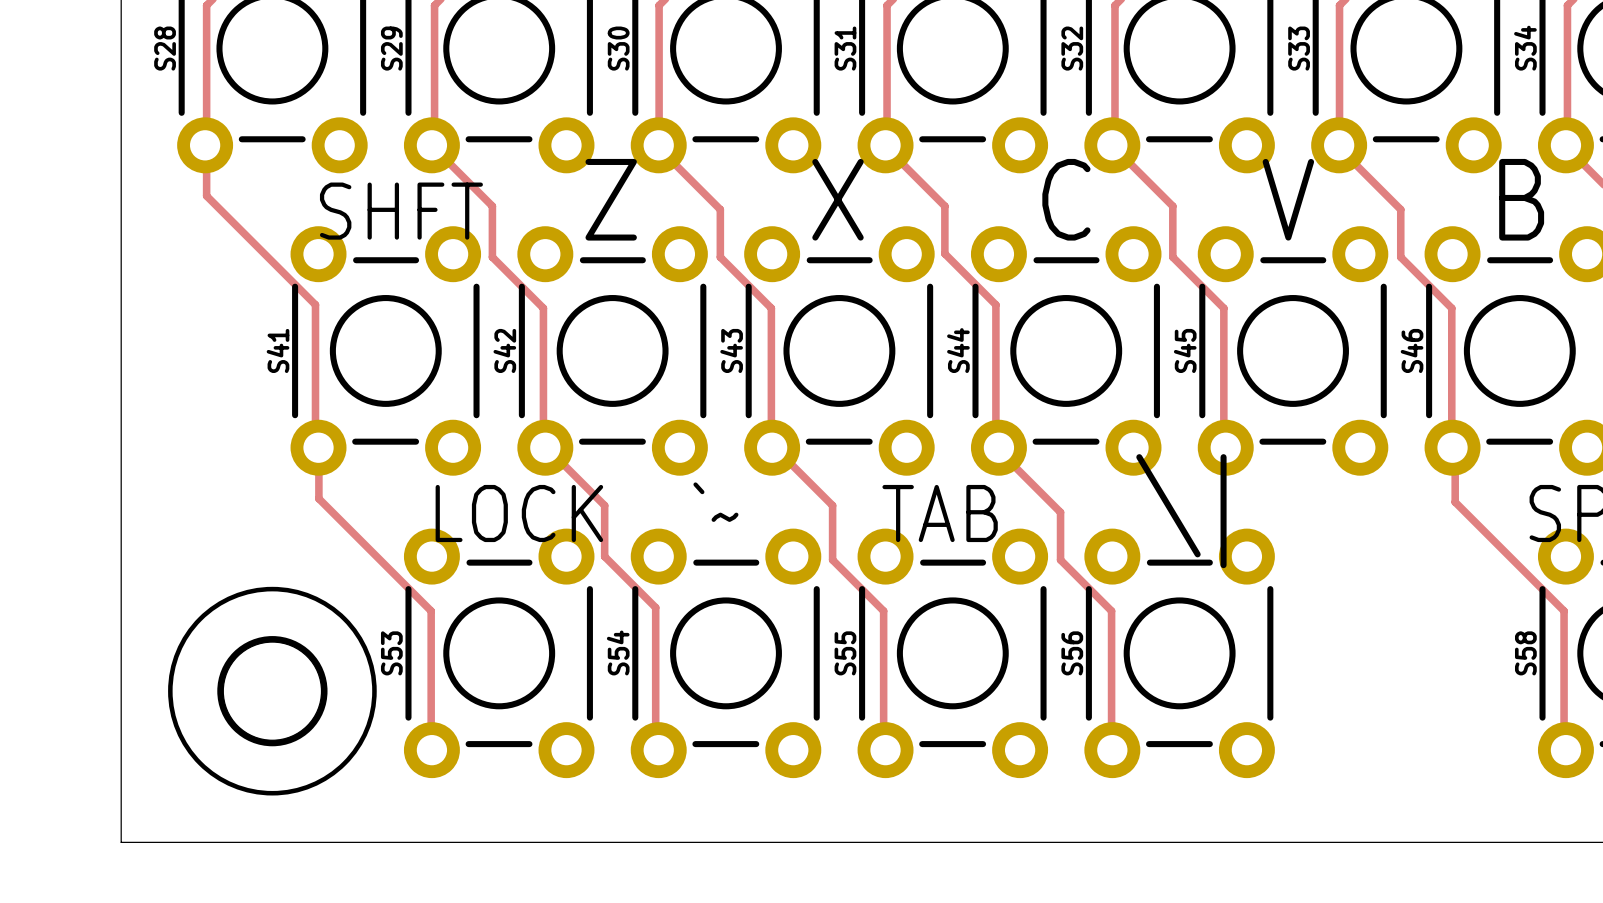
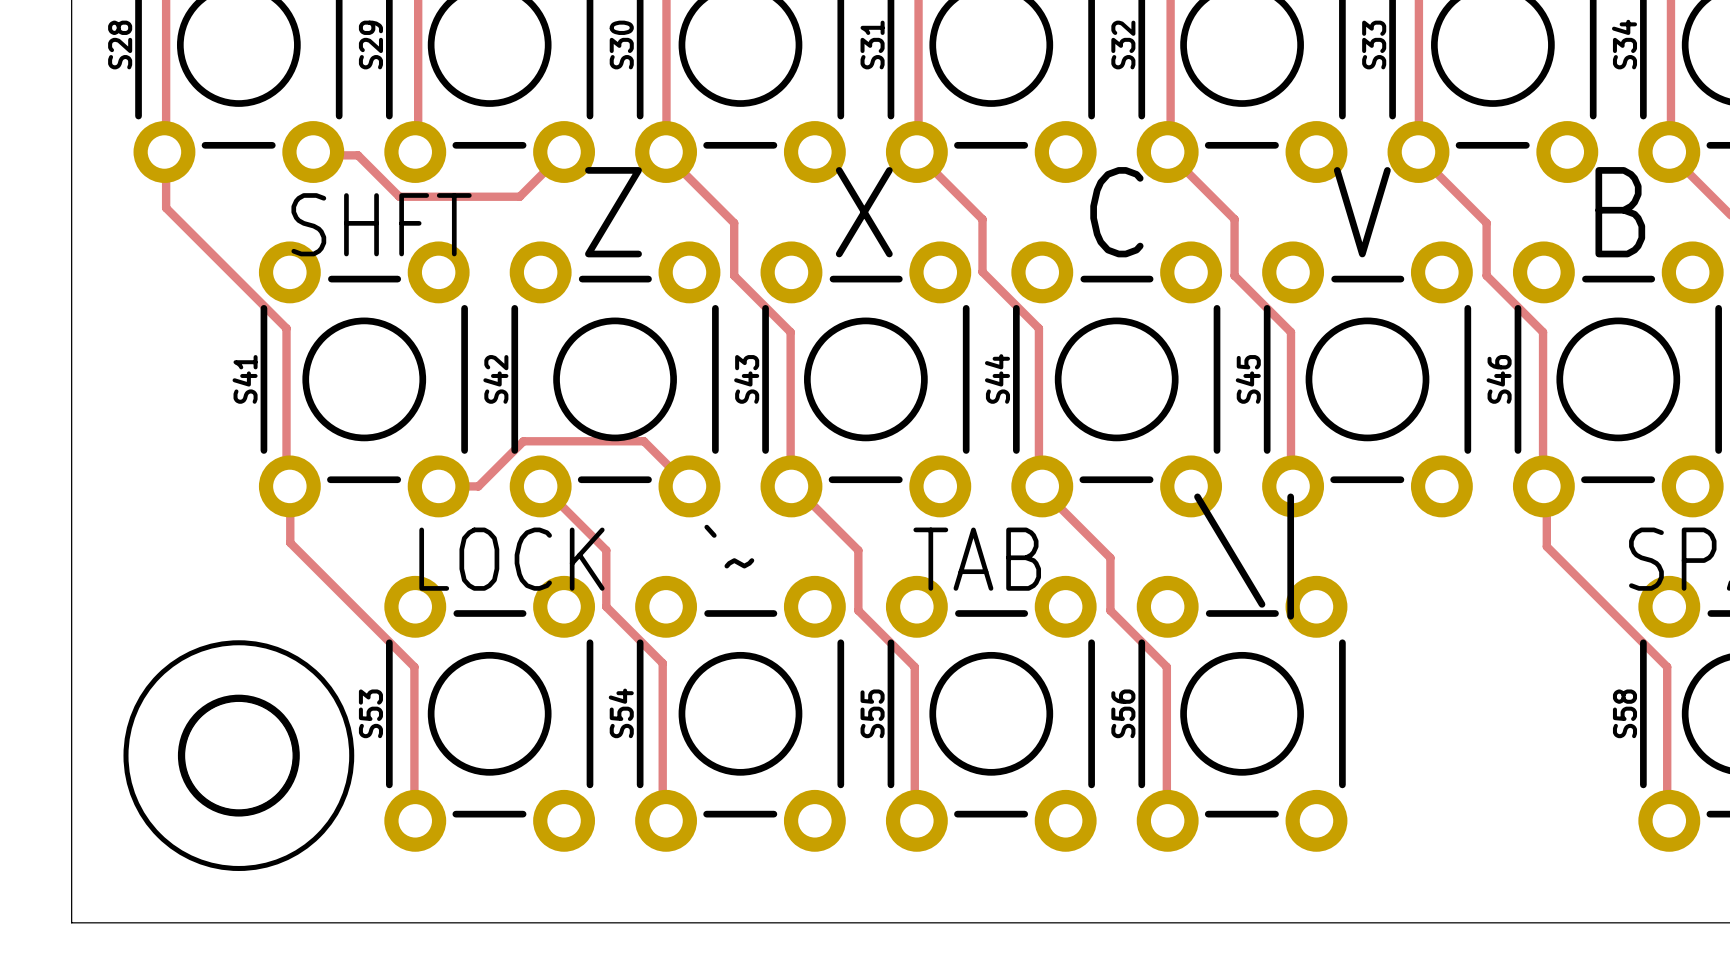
track: none -> (313, 152) (316, 155) (357, 155) (399, 196) (519, 196) (564, 152)
track: (431, 145) (492, 206) (492, 257) (543, 308) (543, 444) (545, 447) -> none
track: none -> (438, 486) (478, 486) (523, 441) (643, 441) (689, 486)

